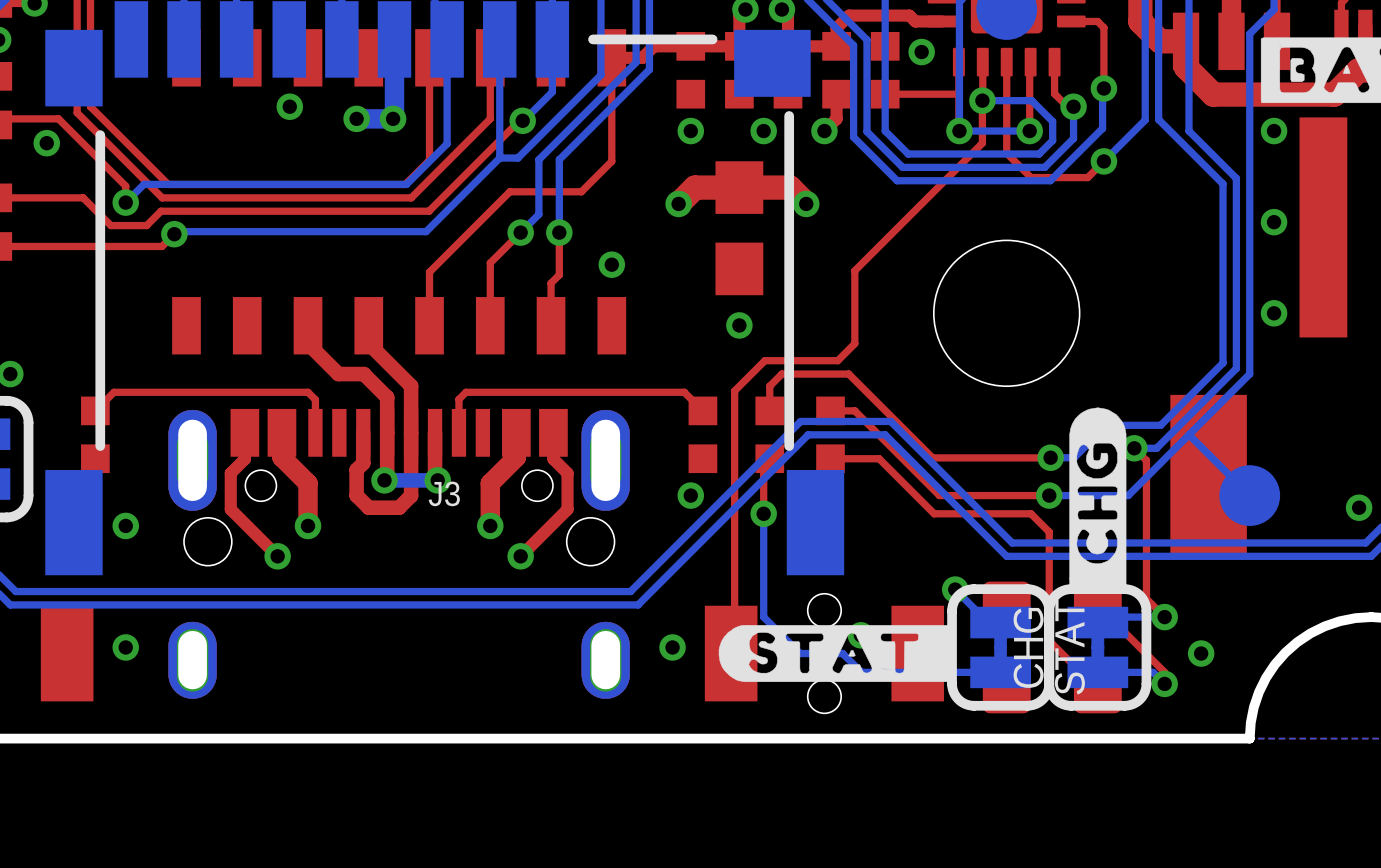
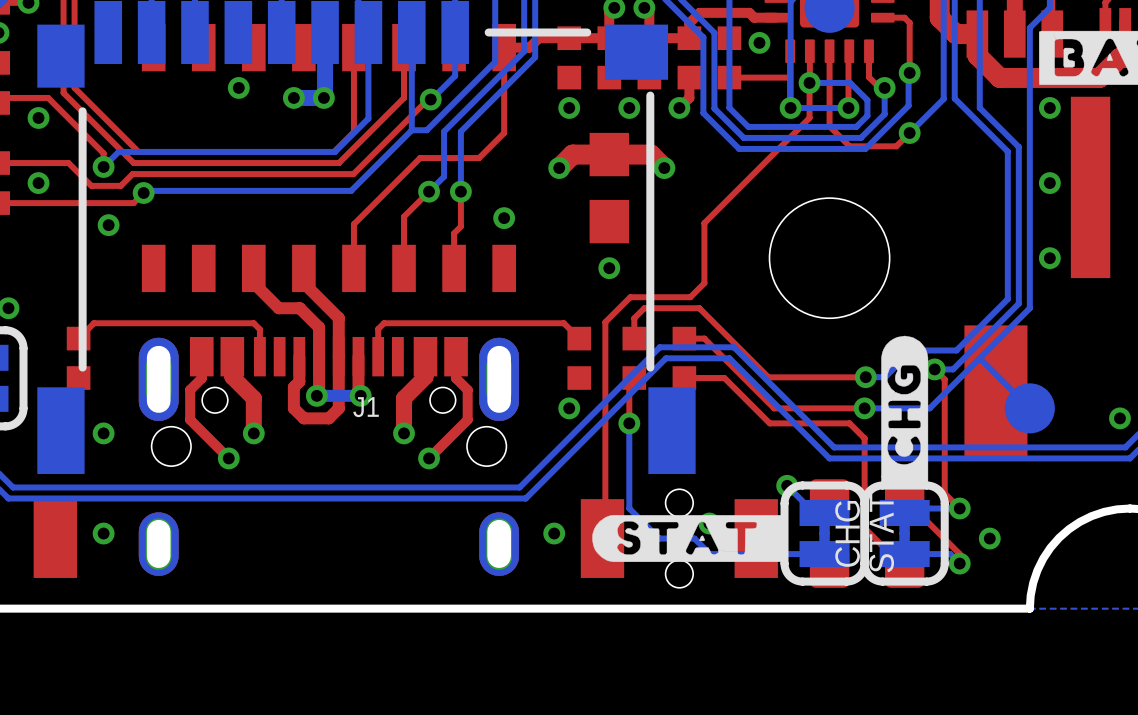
via: none -> (38, 183)
via: none -> (108, 225)
J3 name: J3 (444, 493) -> J1 (366, 407)

